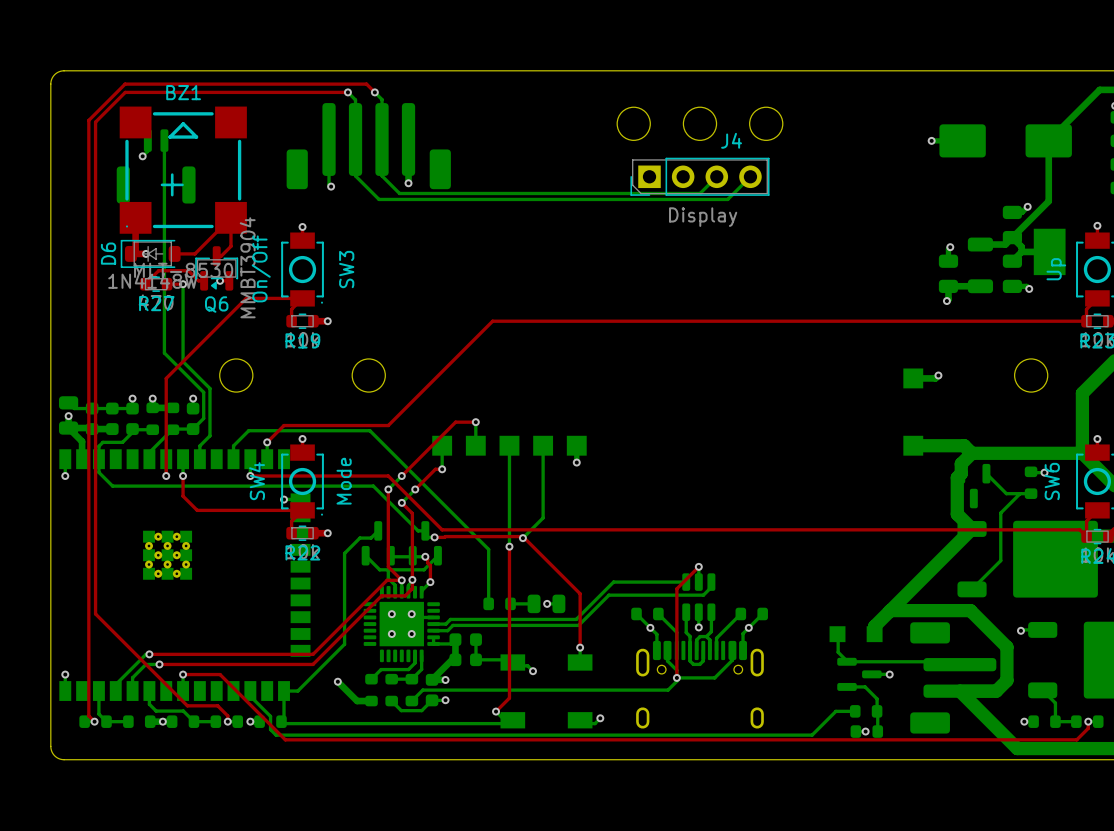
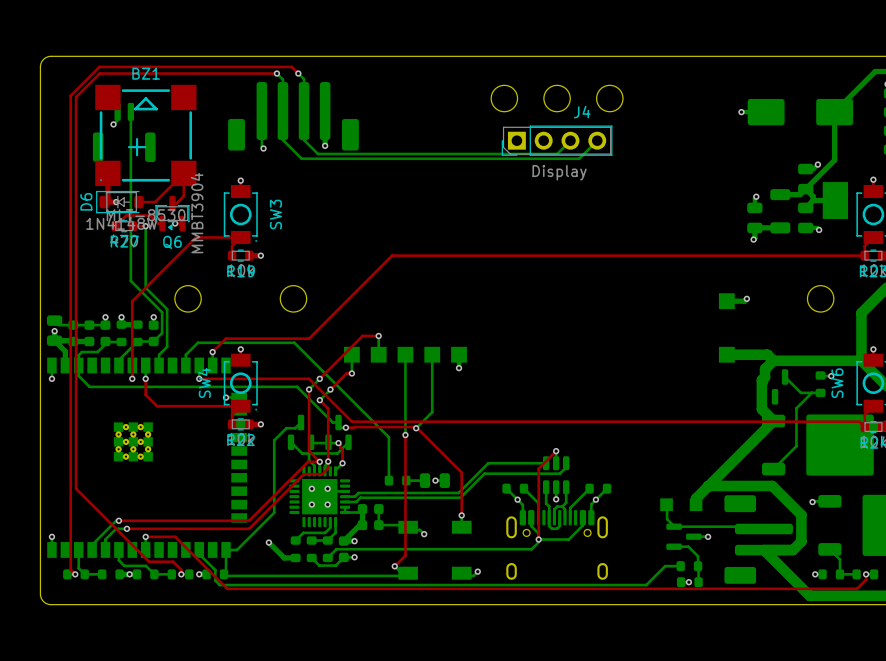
SW3 value: On/Off (261, 268) -> none
part value: Up (1056, 269) -> none
SW4 value: Mode (344, 481) -> none

